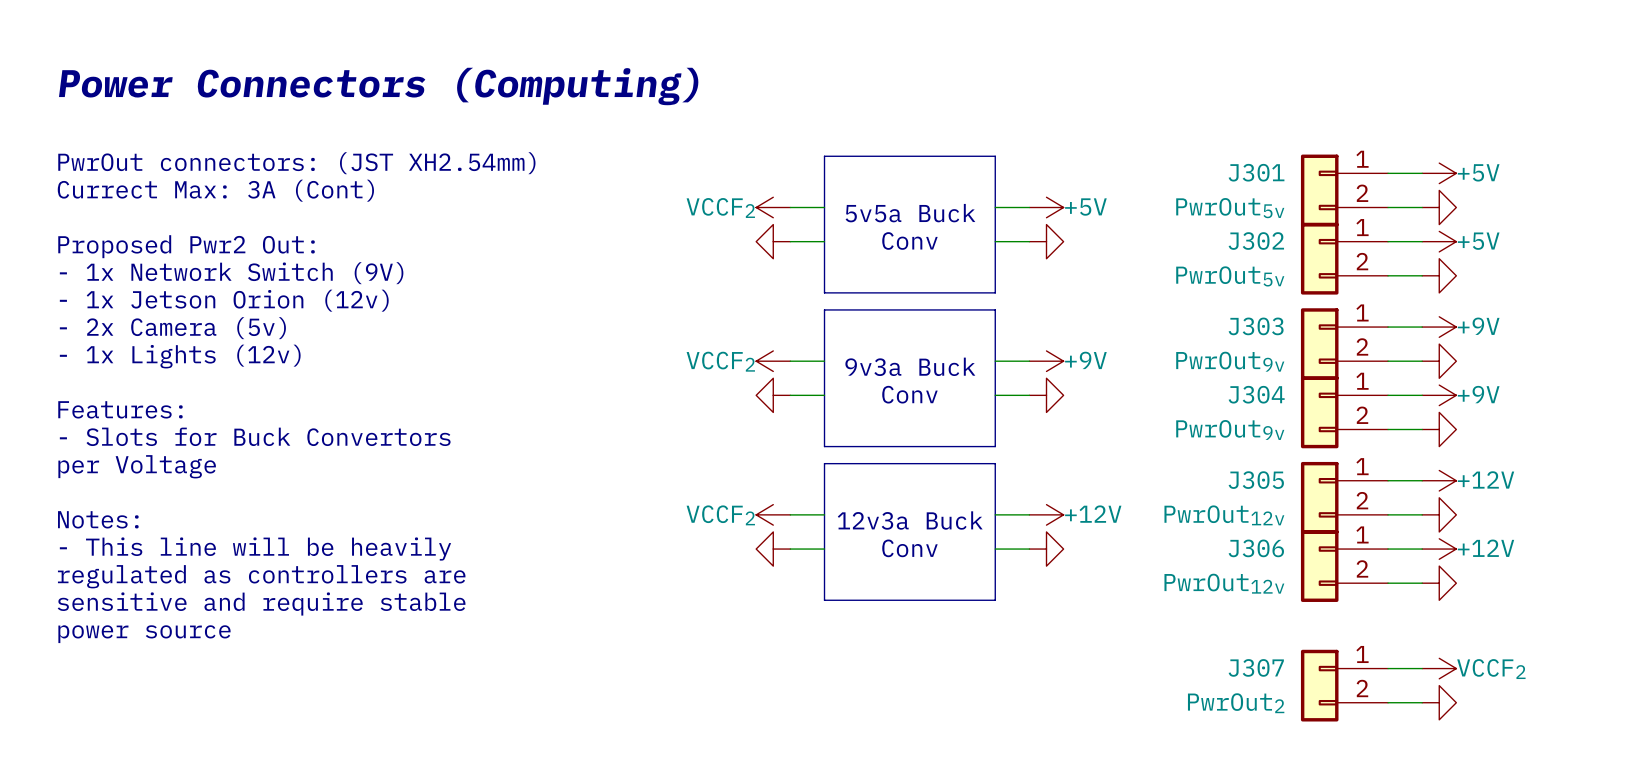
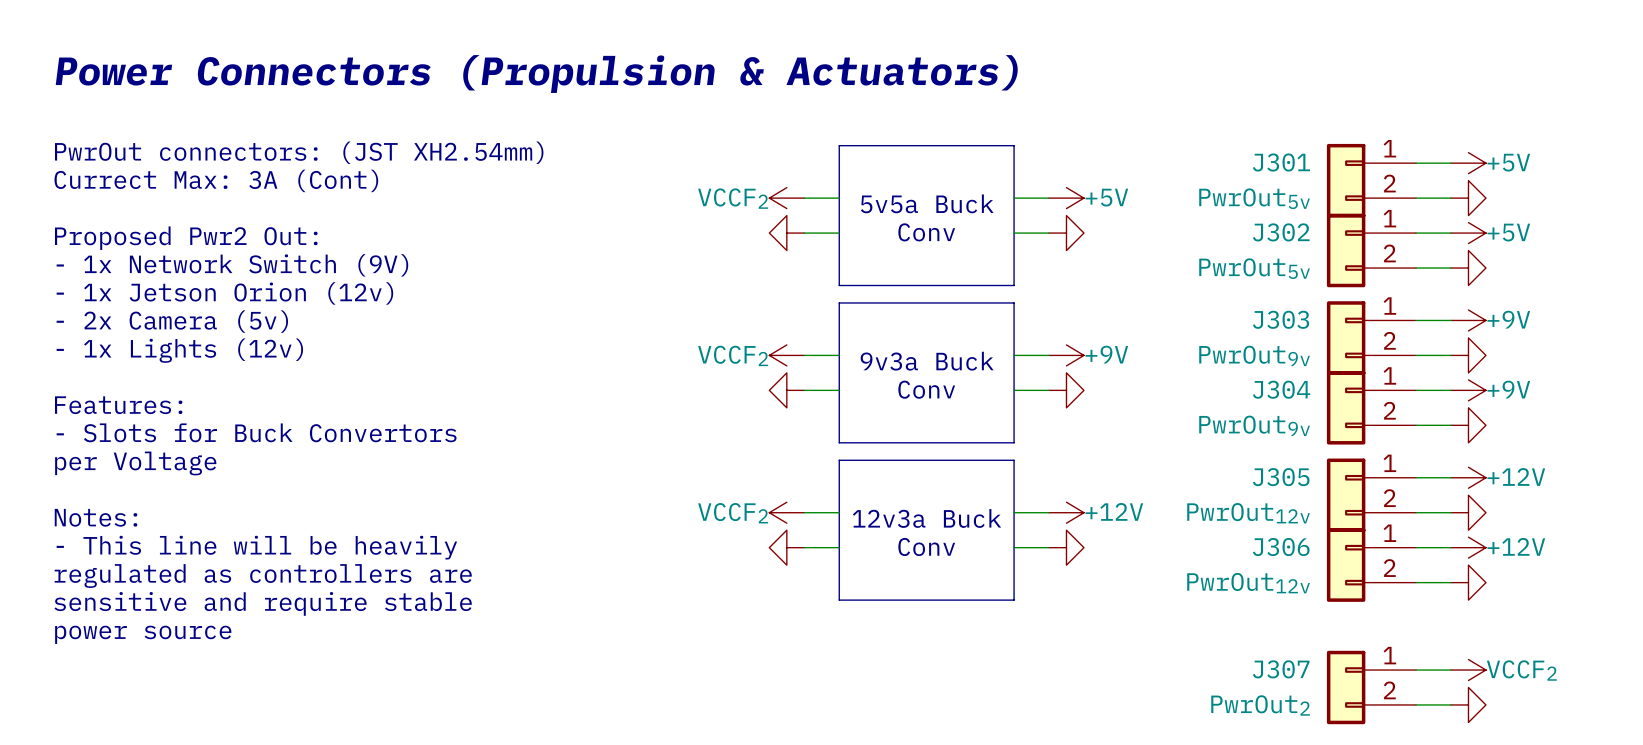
text: Power Connectors (Computing) (378, 86) -> Power Connectors (Propulsion & Actuators) (536, 74)

